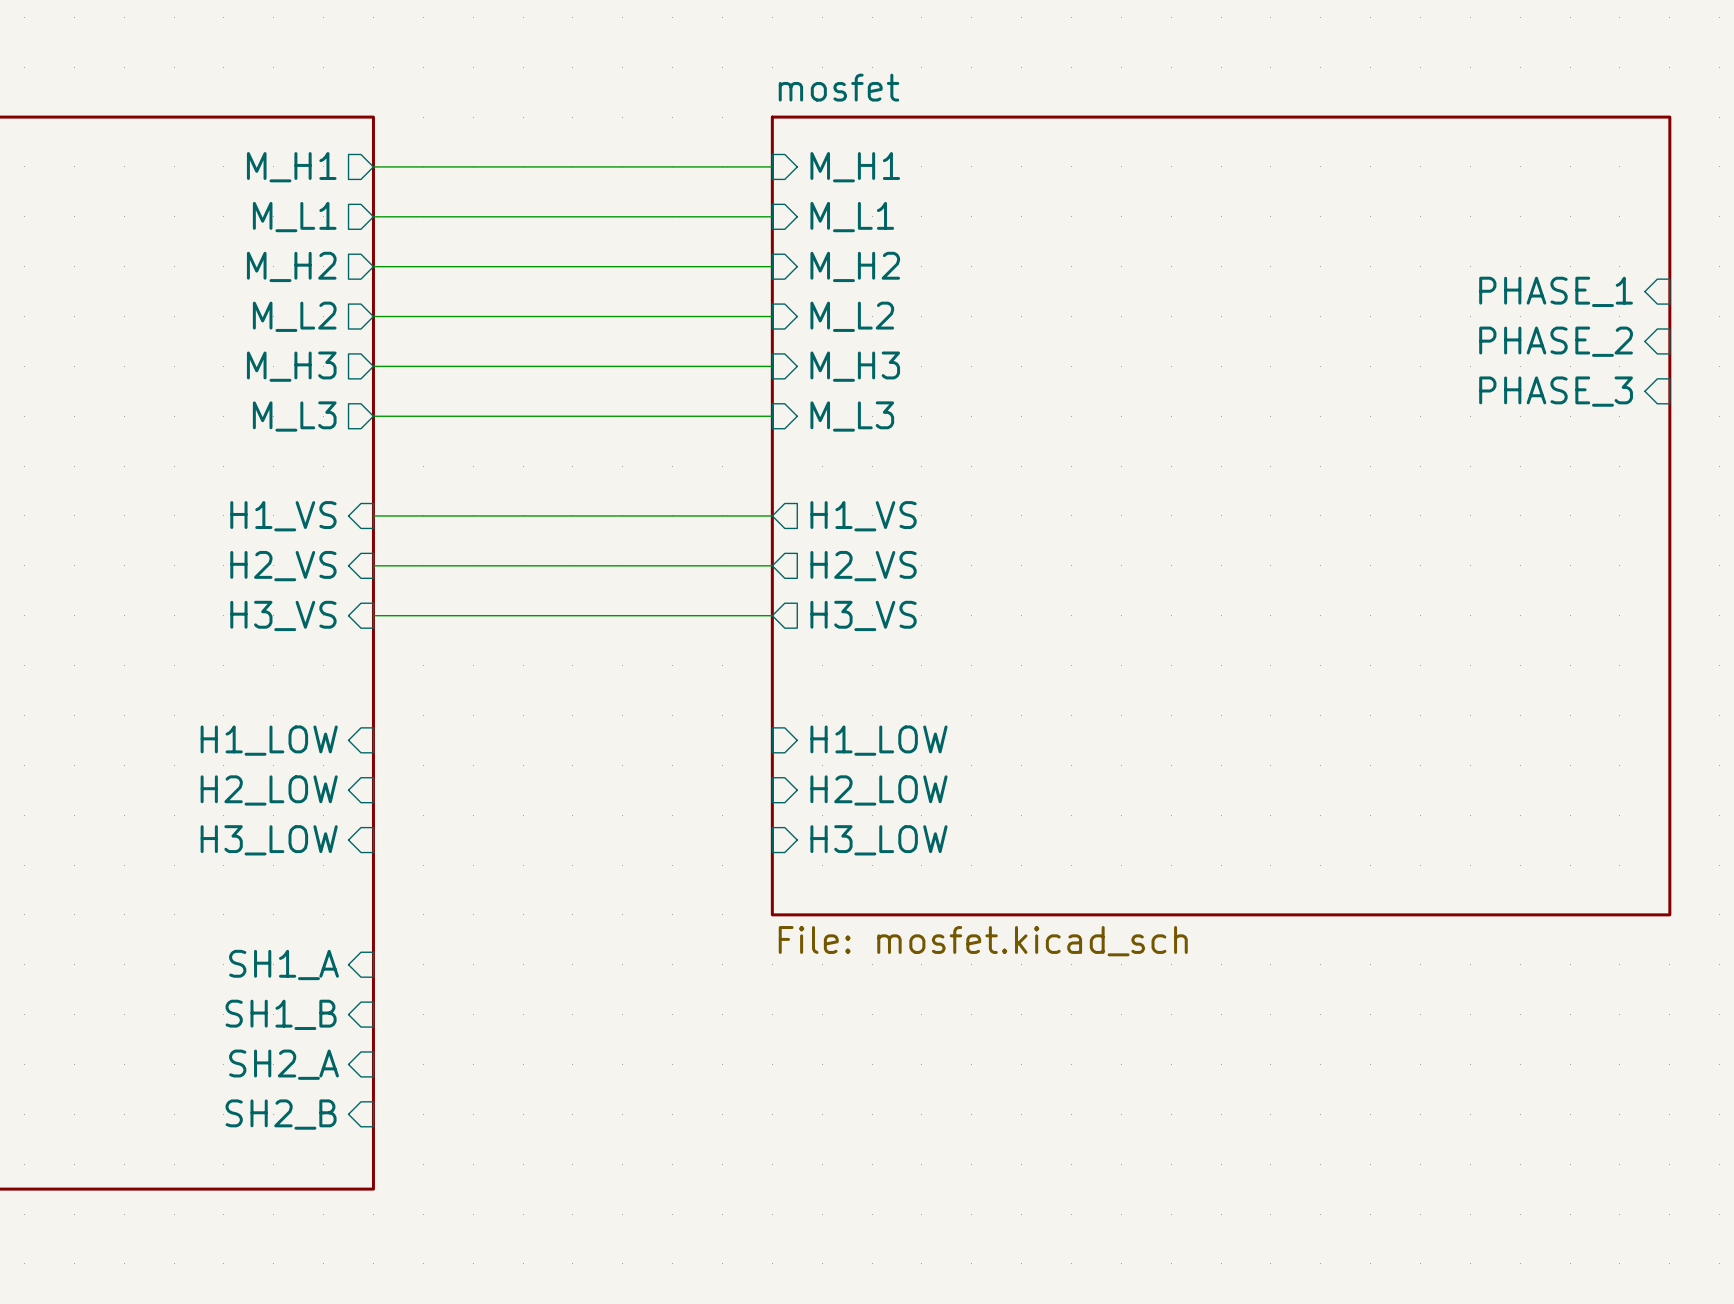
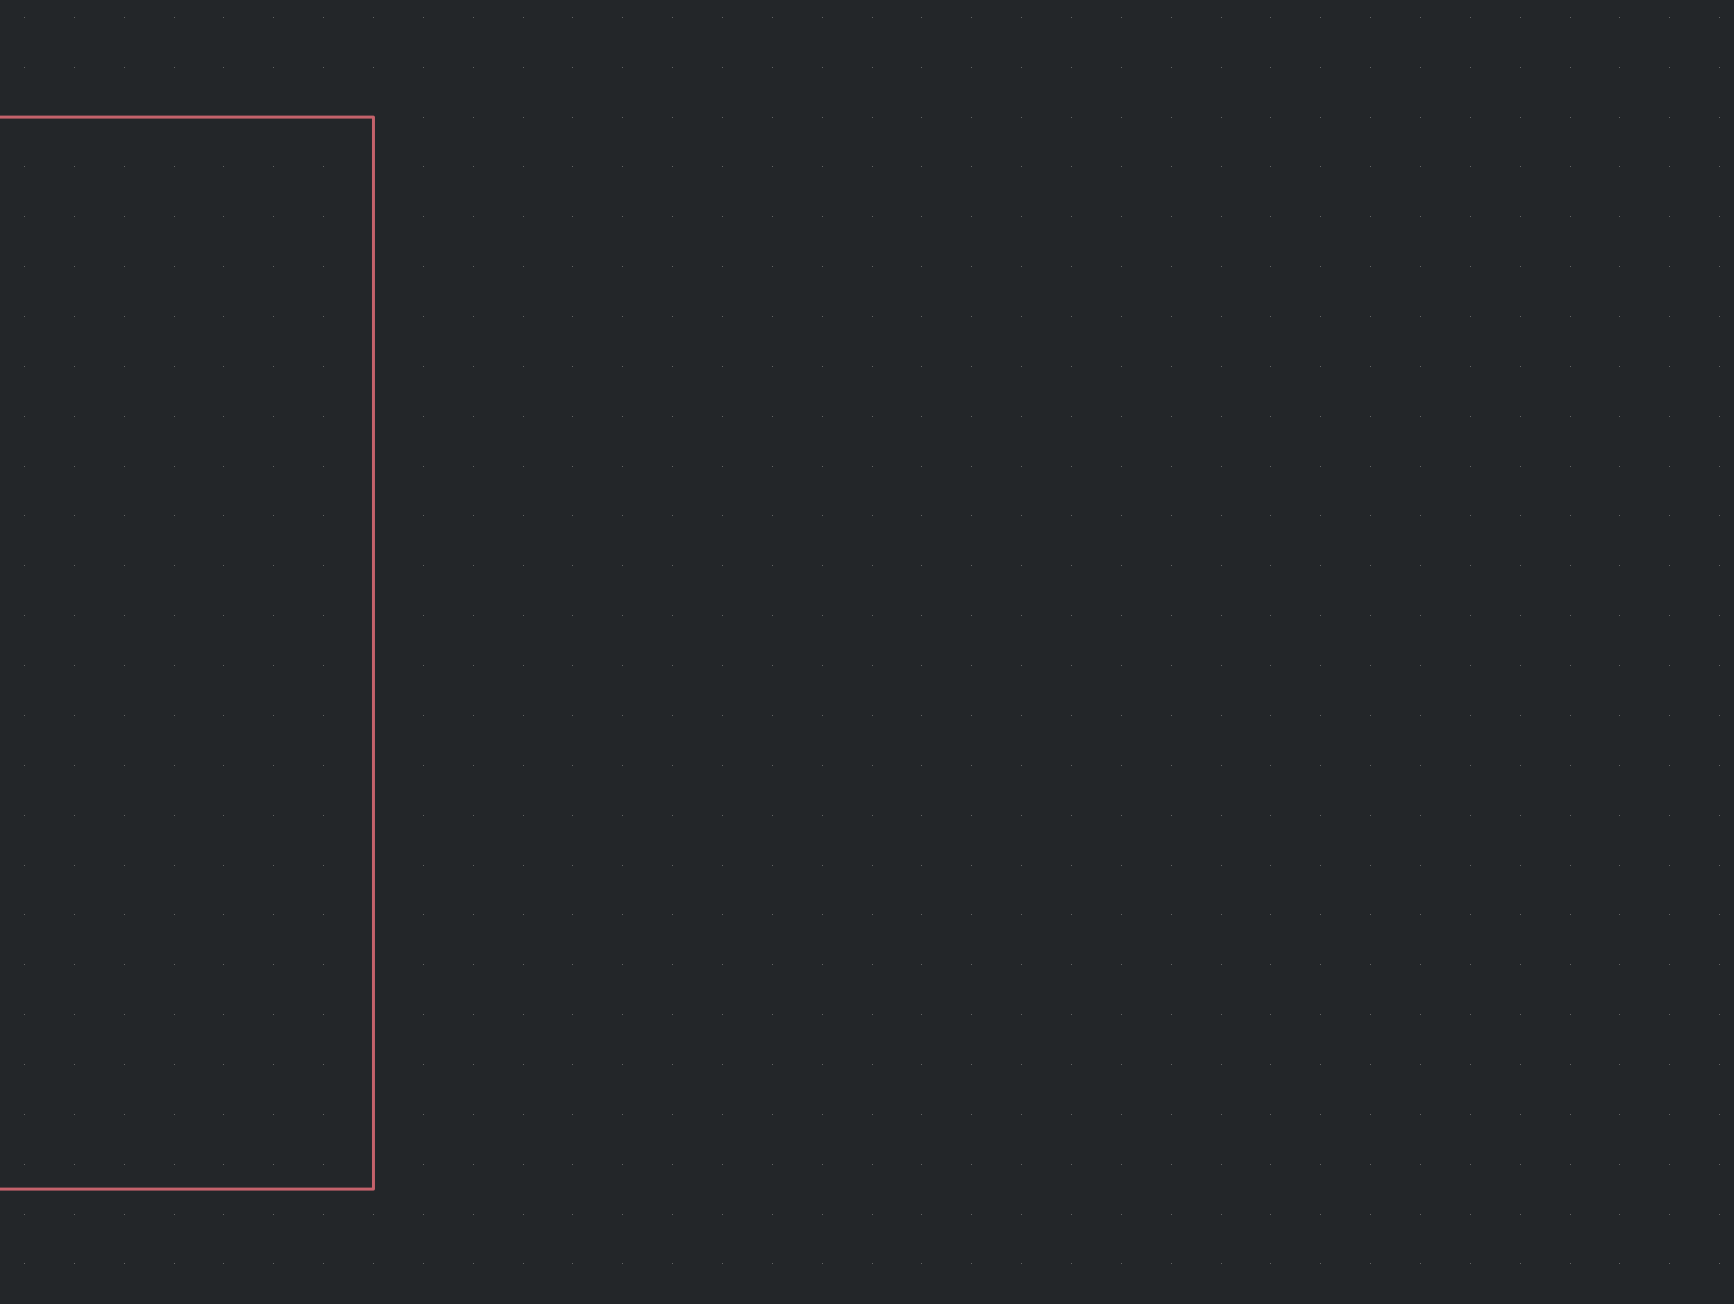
wire: (373, 166) (772, 166) -> none
sheet pin: M_H1 (291, 167) -> none
sheet pin: M_H1 (855, 167) -> none
wire: (373, 216) (772, 216) -> none
sheet pin: M_L1 (294, 217) -> none
sheet pin: M_L1 (852, 217) -> none
sheet pin: M_H2 (291, 266) -> none
wire: (373, 266) (772, 266) -> none
sheet pin: M_H2 (855, 266) -> none
sheet pin: PHASE_1 (1556, 291) -> none
sheet pin: M_L2 (294, 316) -> none
wire: (373, 316) (772, 316) -> none
sheet pin: M_L2 (852, 316) -> none
sheet pin: PHASE_2 (1556, 341) -> none
sheet pin: M_H3 (291, 366) -> none
wire: (373, 366) (772, 366) -> none
sheet pin: M_H3 (855, 366) -> none
sheet pin: PHASE_3 (1556, 391) -> none
sheet pin: M_L3 (294, 416) -> none
wire: (373, 416) (772, 416) -> none
sheet pin: M_L3 (852, 416) -> none
wire: (373, 515) (772, 515) -> none
sheet mosfet: File: mosfet.kicad_sch (1221, 515) -> none
sheet pin: H1_VS (283, 516) -> none
sheet pin: H1_VS (863, 516) -> none
wire: (373, 565) (772, 565) -> none
sheet pin: H2_VS (283, 566) -> none
sheet pin: H2_VS (863, 566) -> none
sheet pin: H3_VS (283, 615) -> none
wire: (373, 615) (772, 615) -> none
sheet pin: H3_VS (863, 615) -> none
sheet pin: H1_LOW (269, 740) -> none
sheet pin: H1_LOW (878, 740) -> none
sheet pin: H2_LOW (269, 790) -> none
sheet pin: H2_LOW (878, 790) -> none
sheet pin: H3_LOW (269, 840) -> none
sheet pin: H3_LOW (878, 840) -> none
sheet pin: SH1_A (284, 964) -> none
sheet pin: SH1_B (281, 1014) -> none
sheet pin: SH2_A (284, 1064) -> none
sheet pin: SH2_B (281, 1114) -> none

